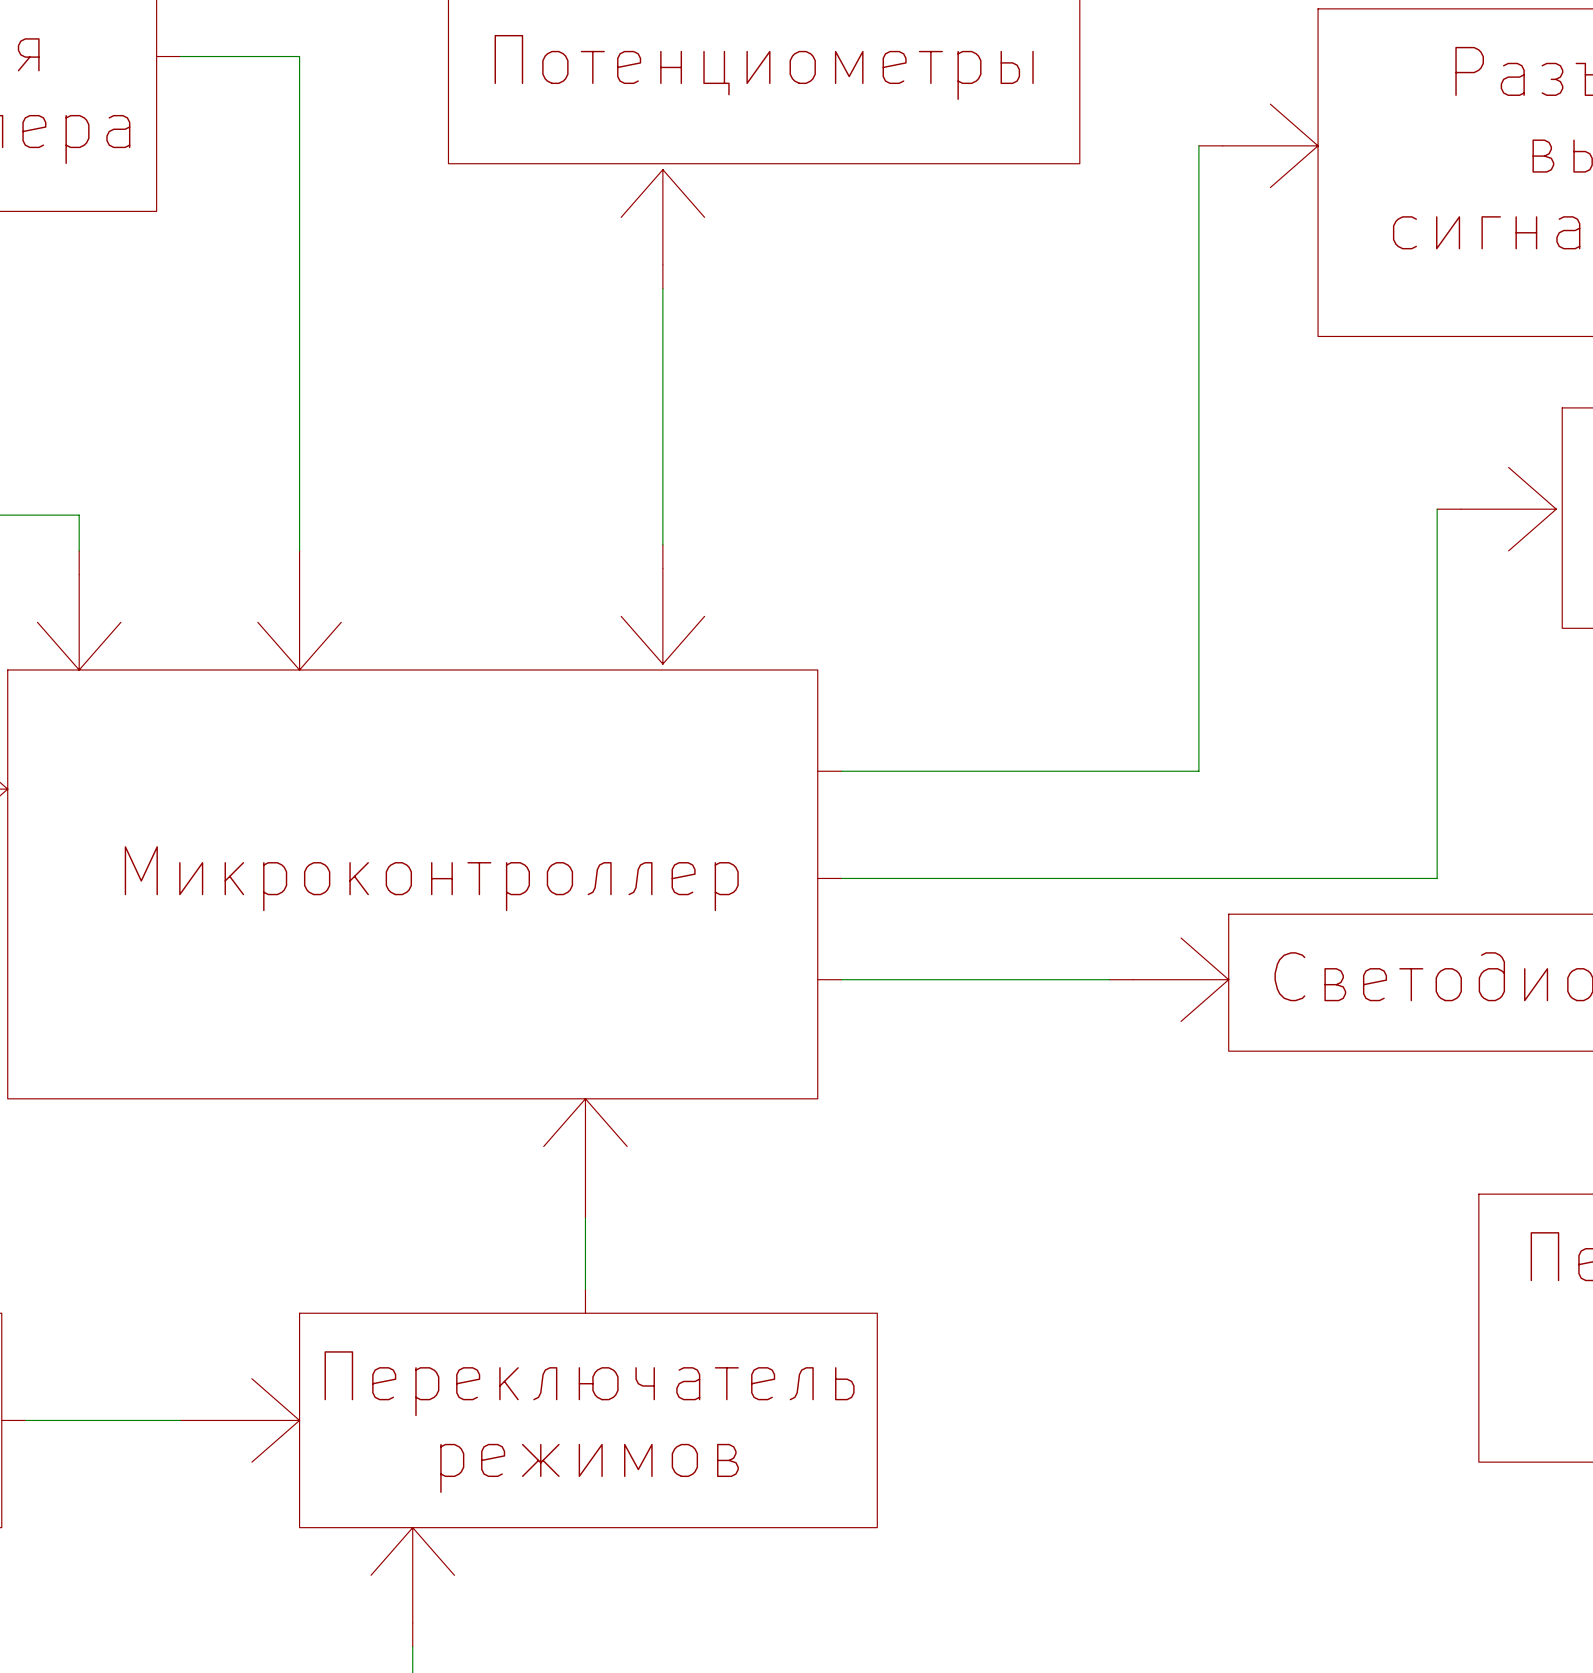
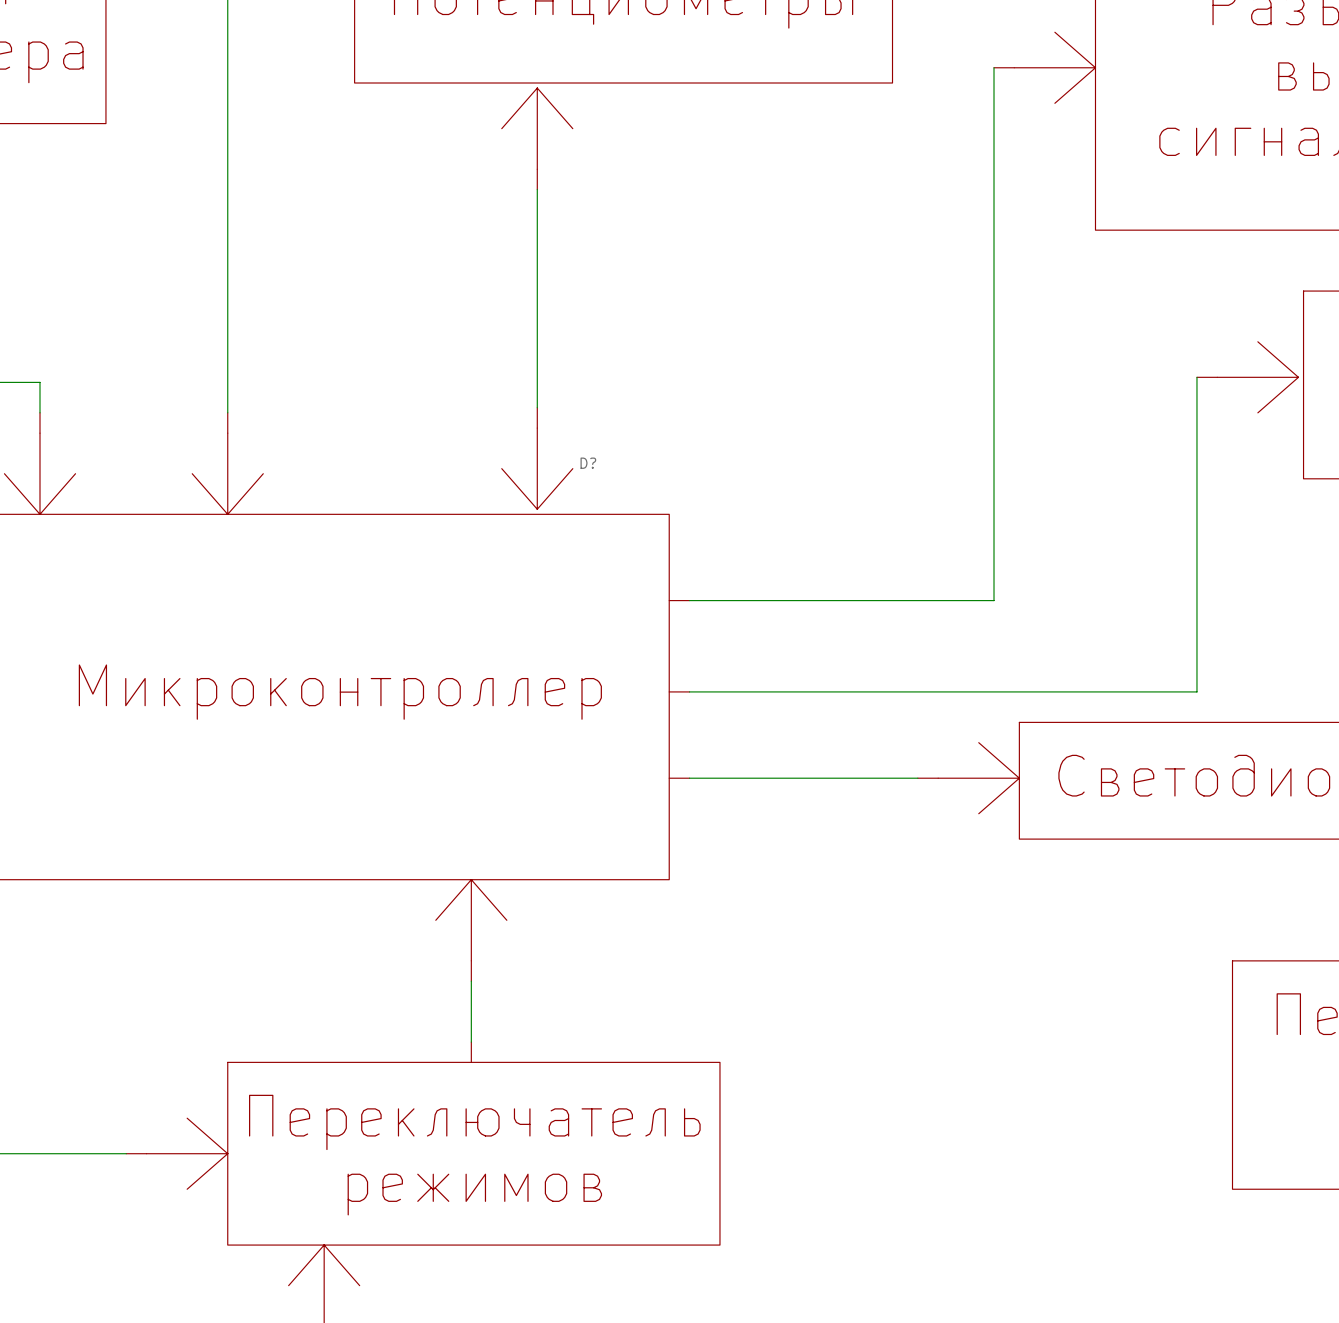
D? name: none -> D? (588, 463)

